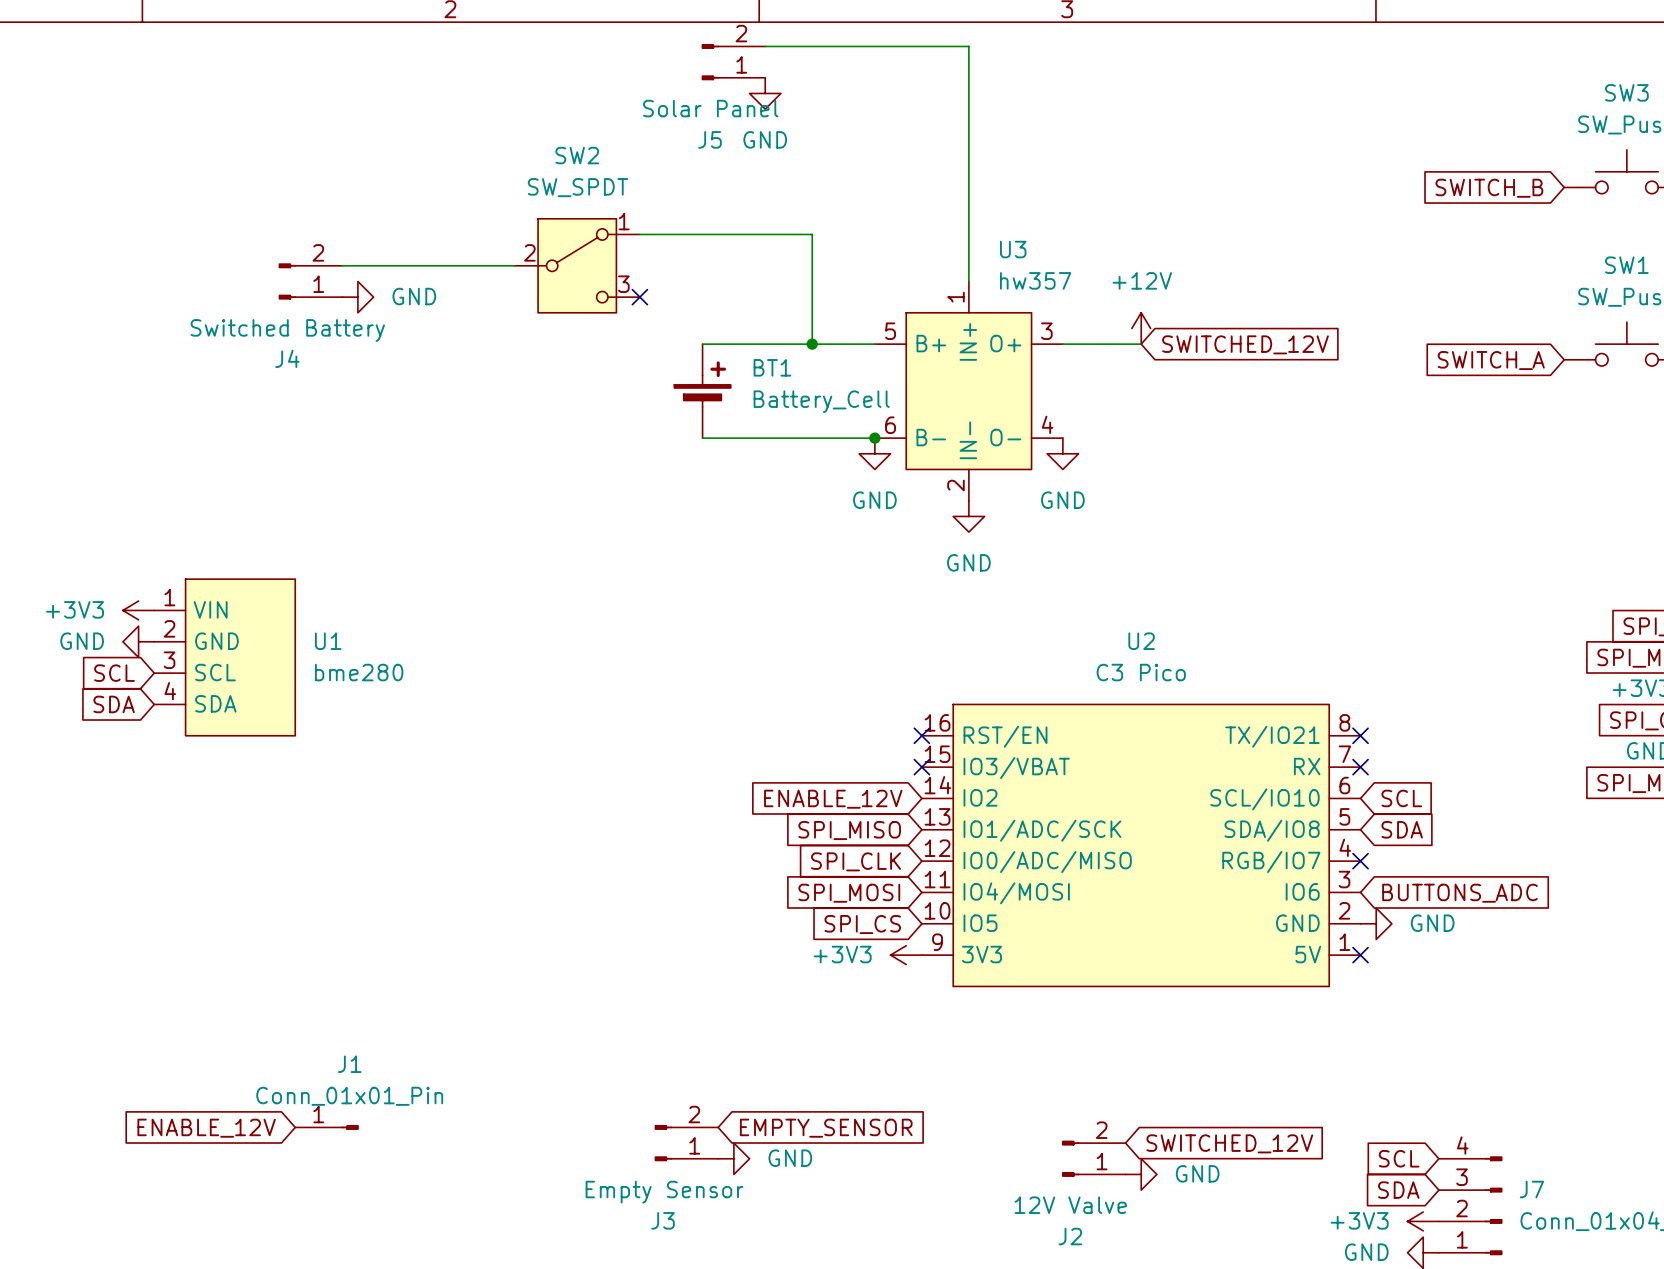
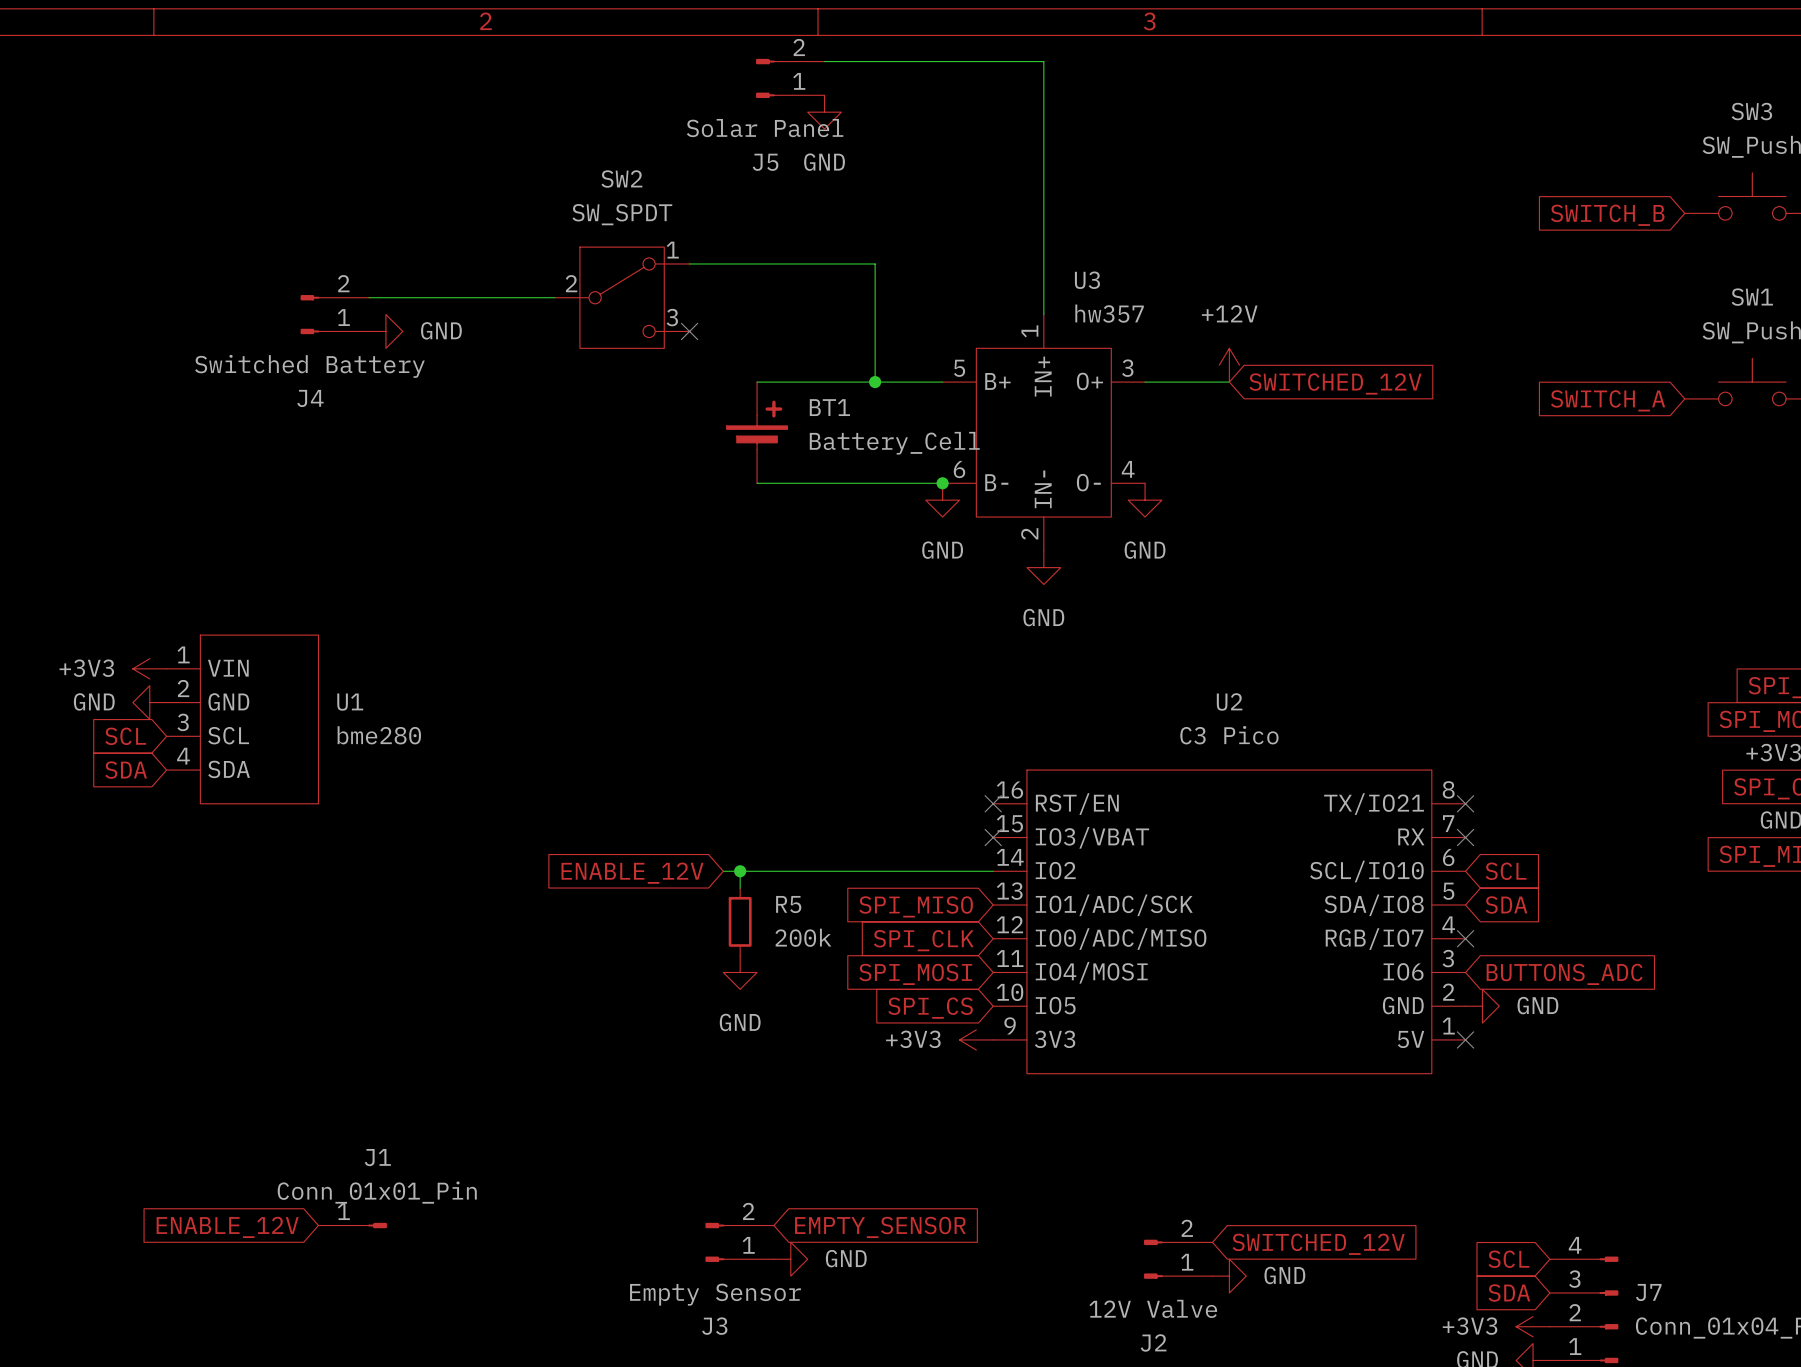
wire: none -> (723, 871) (993, 871)
wire: none -> (740, 871) (740, 888)
junction: none -> (740, 871)
global label position: ENABLE_12V (833, 799) -> ENABLE_12V (632, 873)
R5: none -> 200k (740, 921)
power symbol: none -> GND (740, 972)

